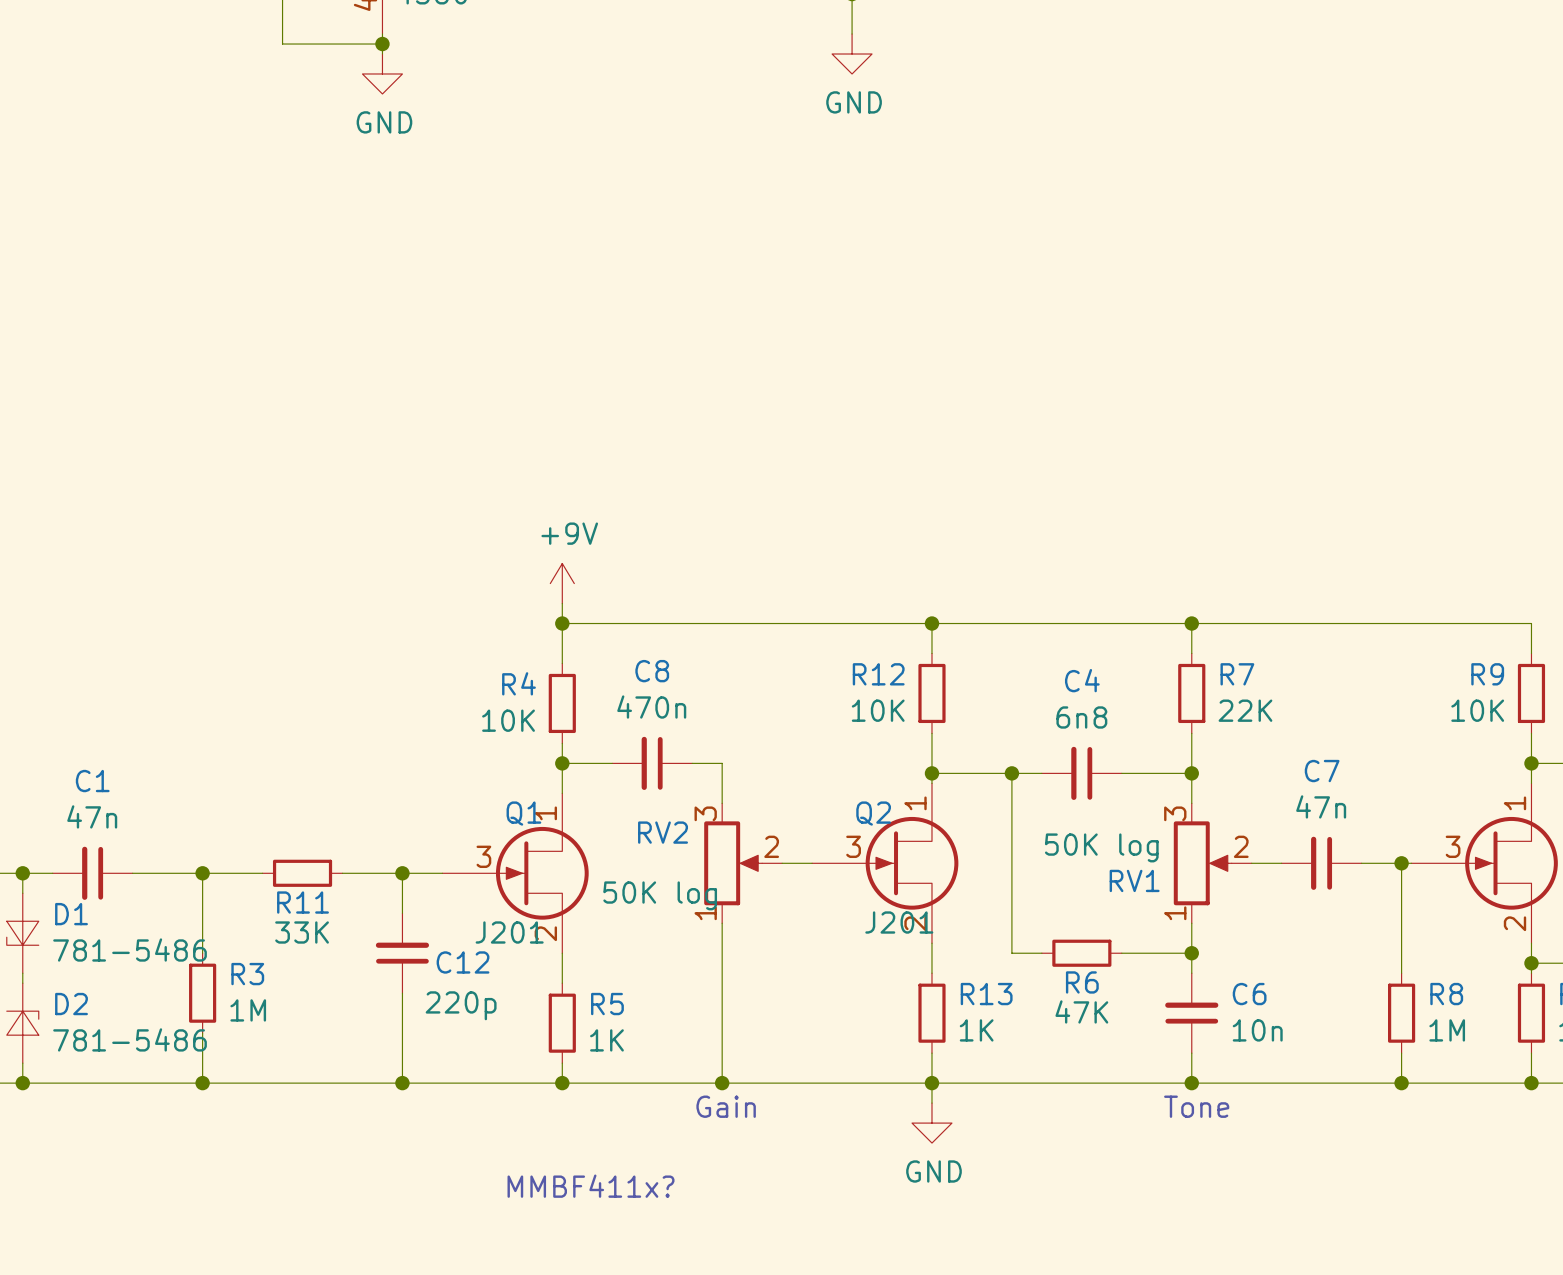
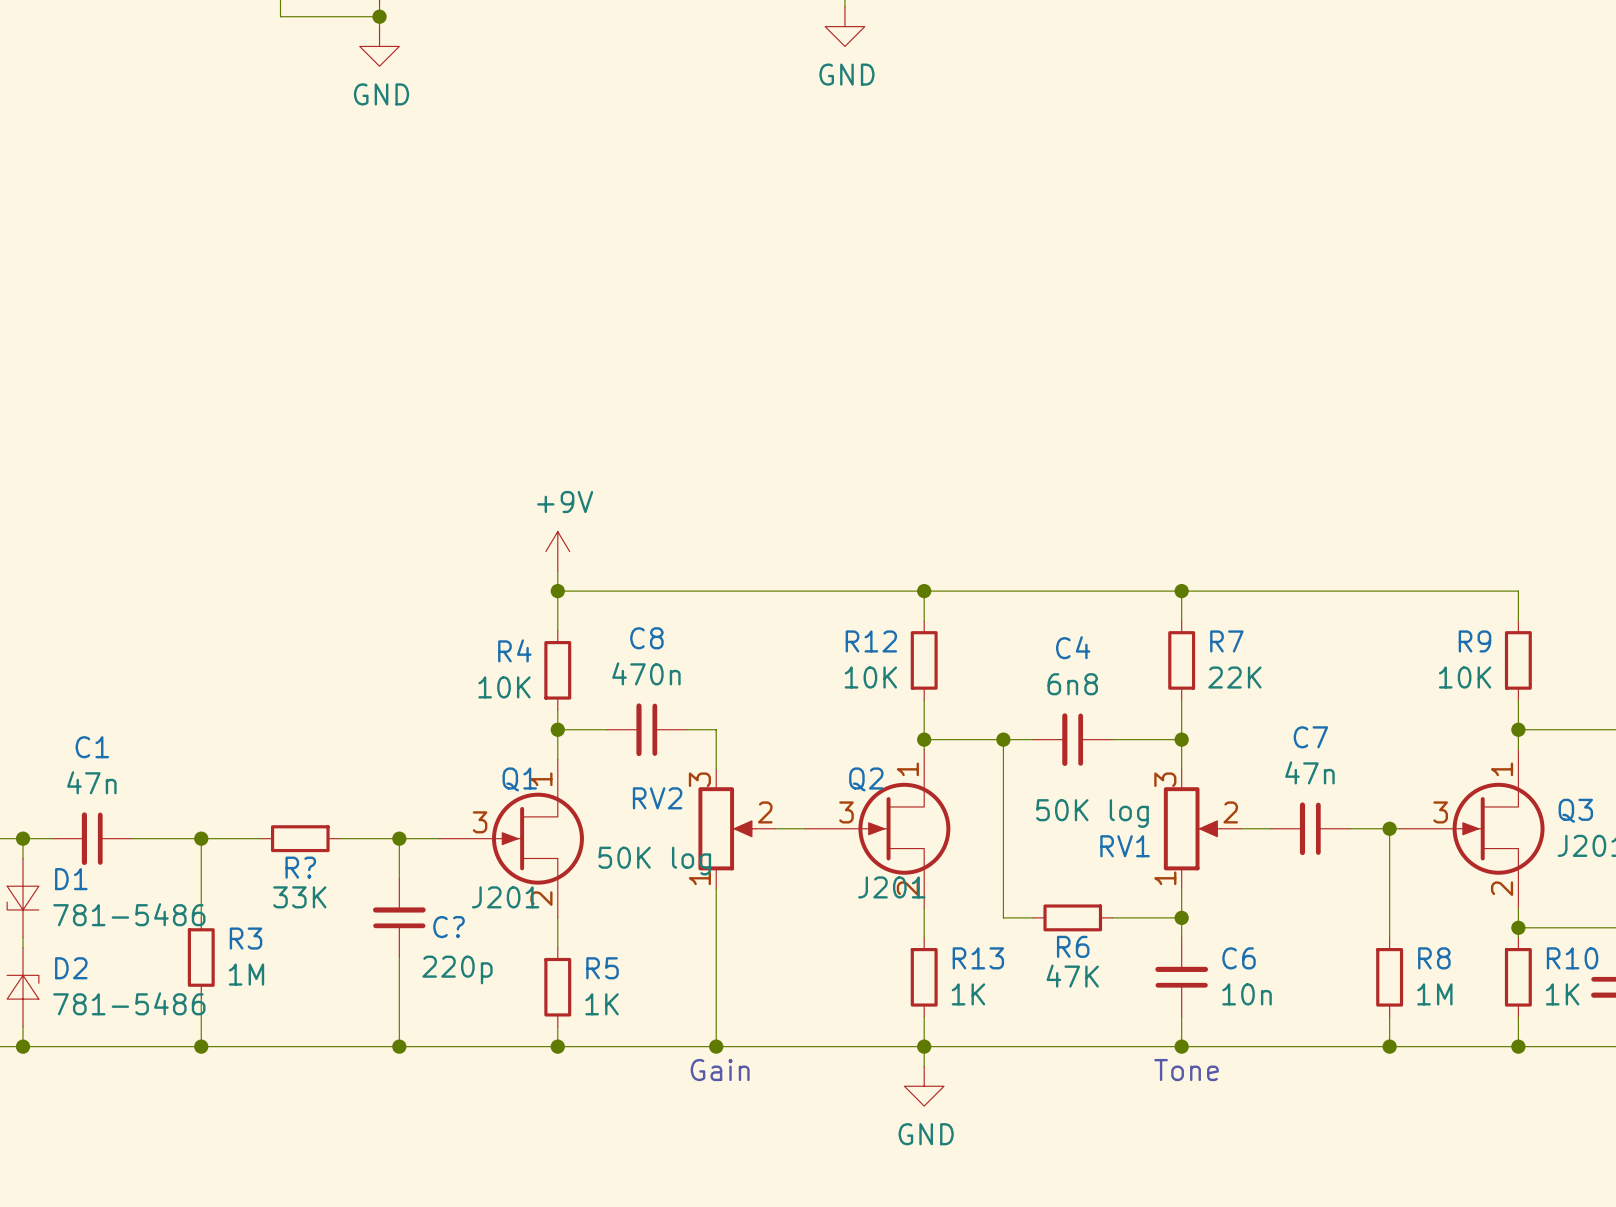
R11 name: R11 (303, 902) -> R? (300, 867)
C12 name: C12 (463, 962) -> C? (448, 927)
text: MMBF411x? (591, 1186) -> none

